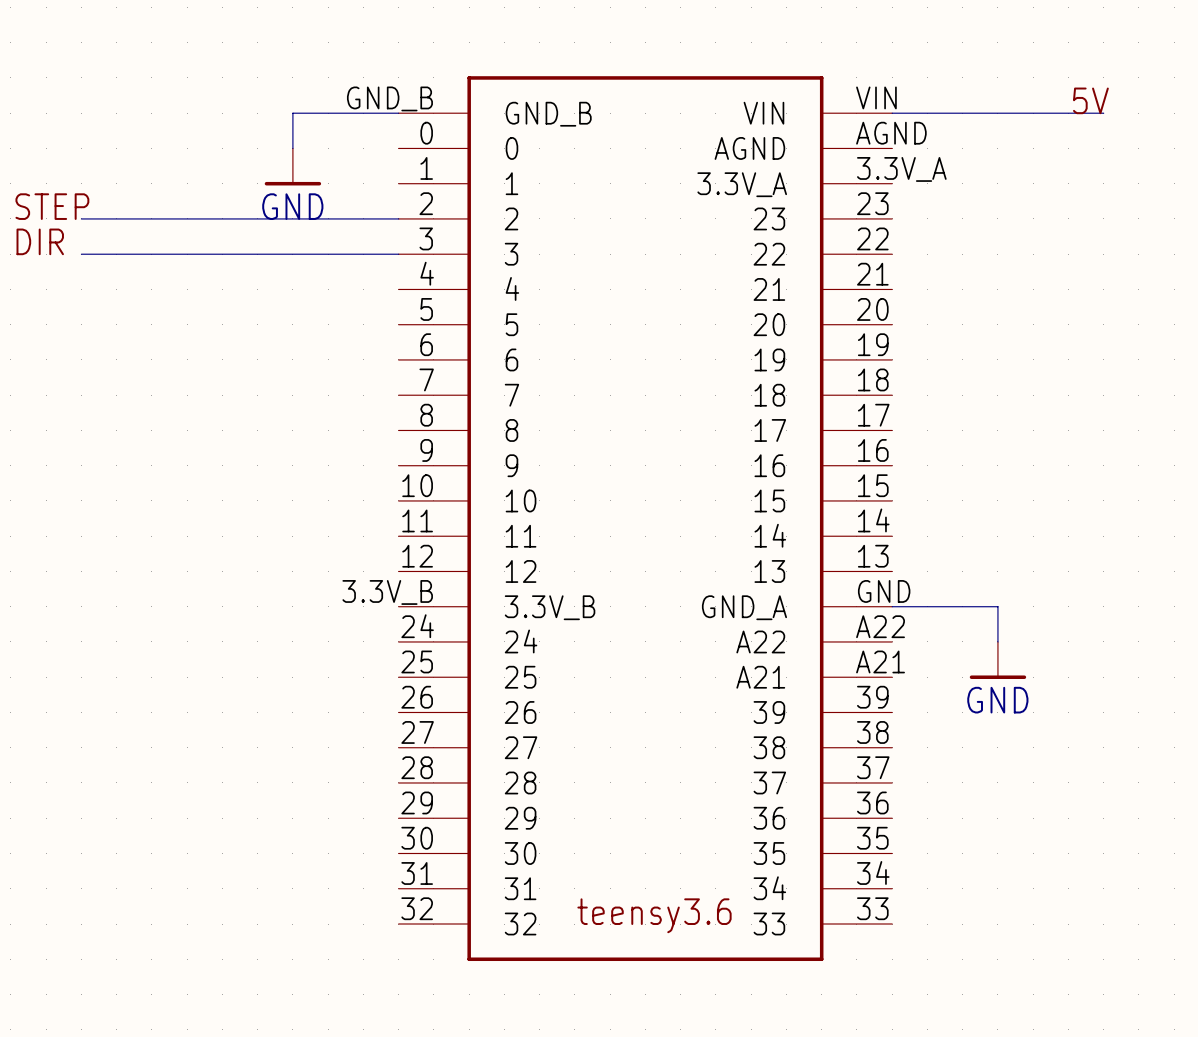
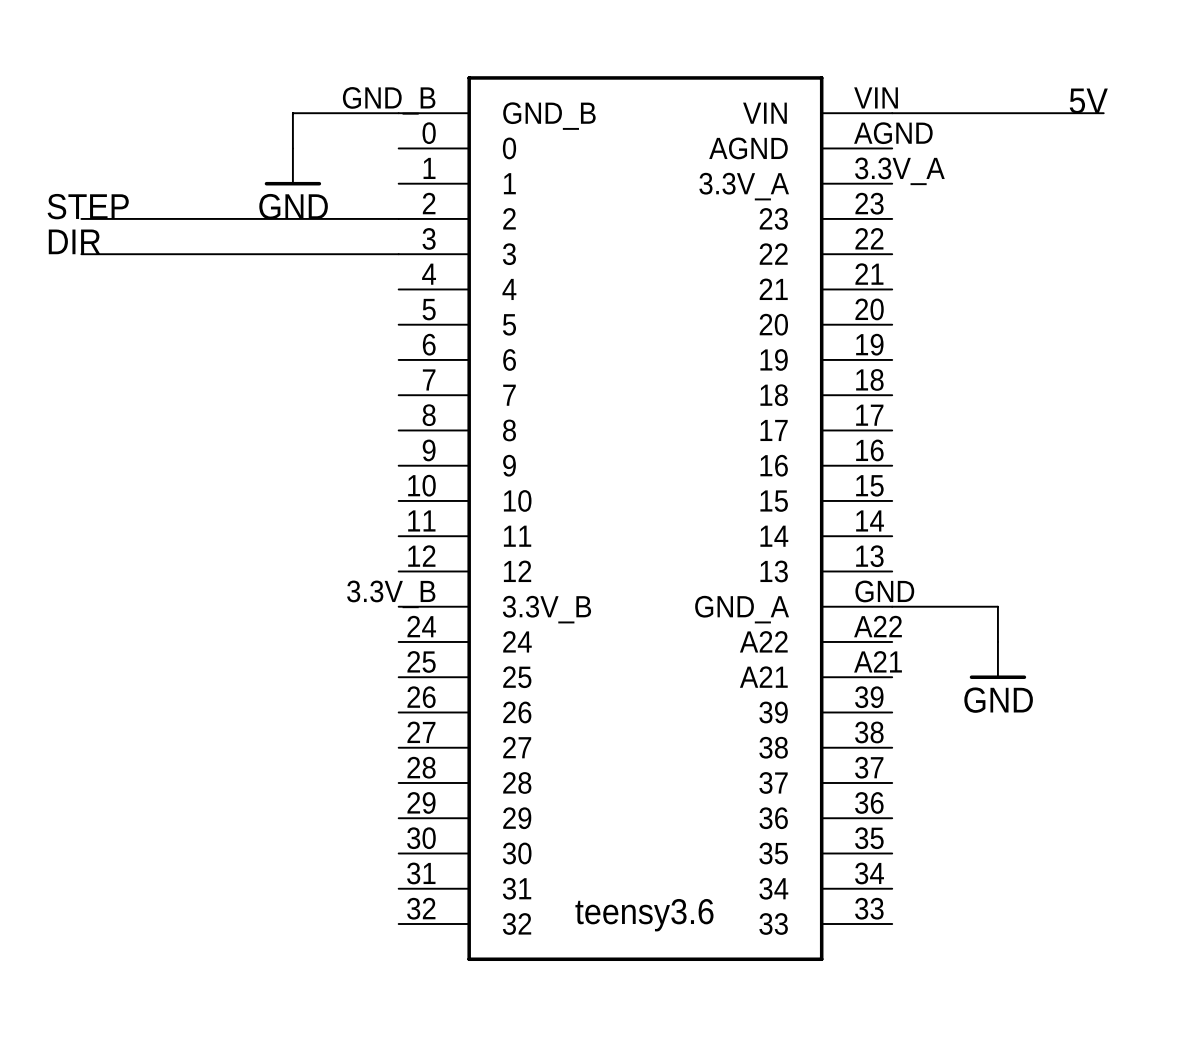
label position: STEP (52, 206) -> STEP (88, 206)
label position: DIR (40, 241) -> DIR (74, 241)

